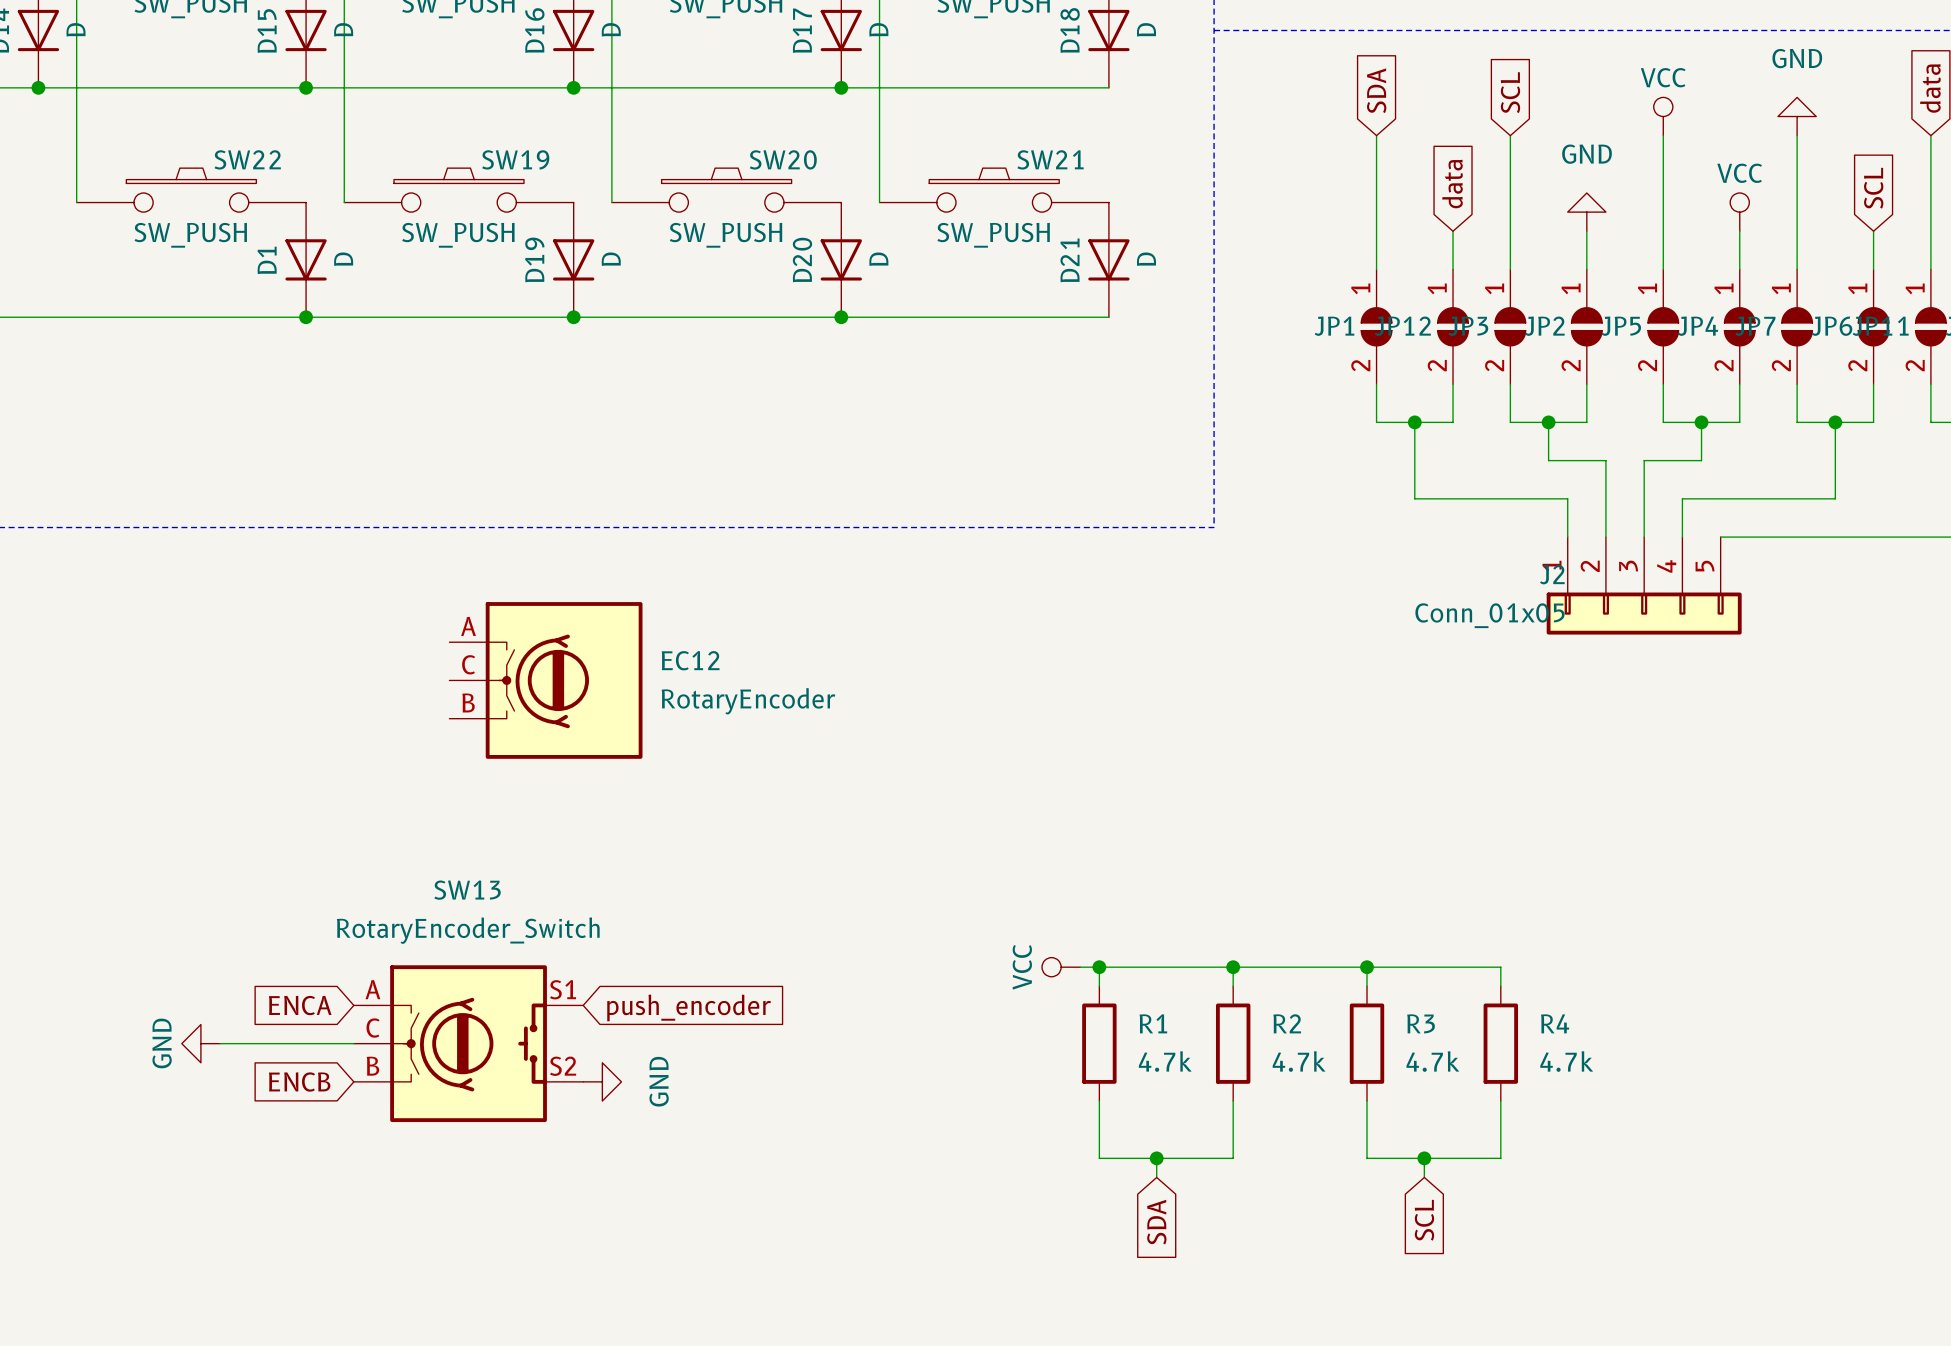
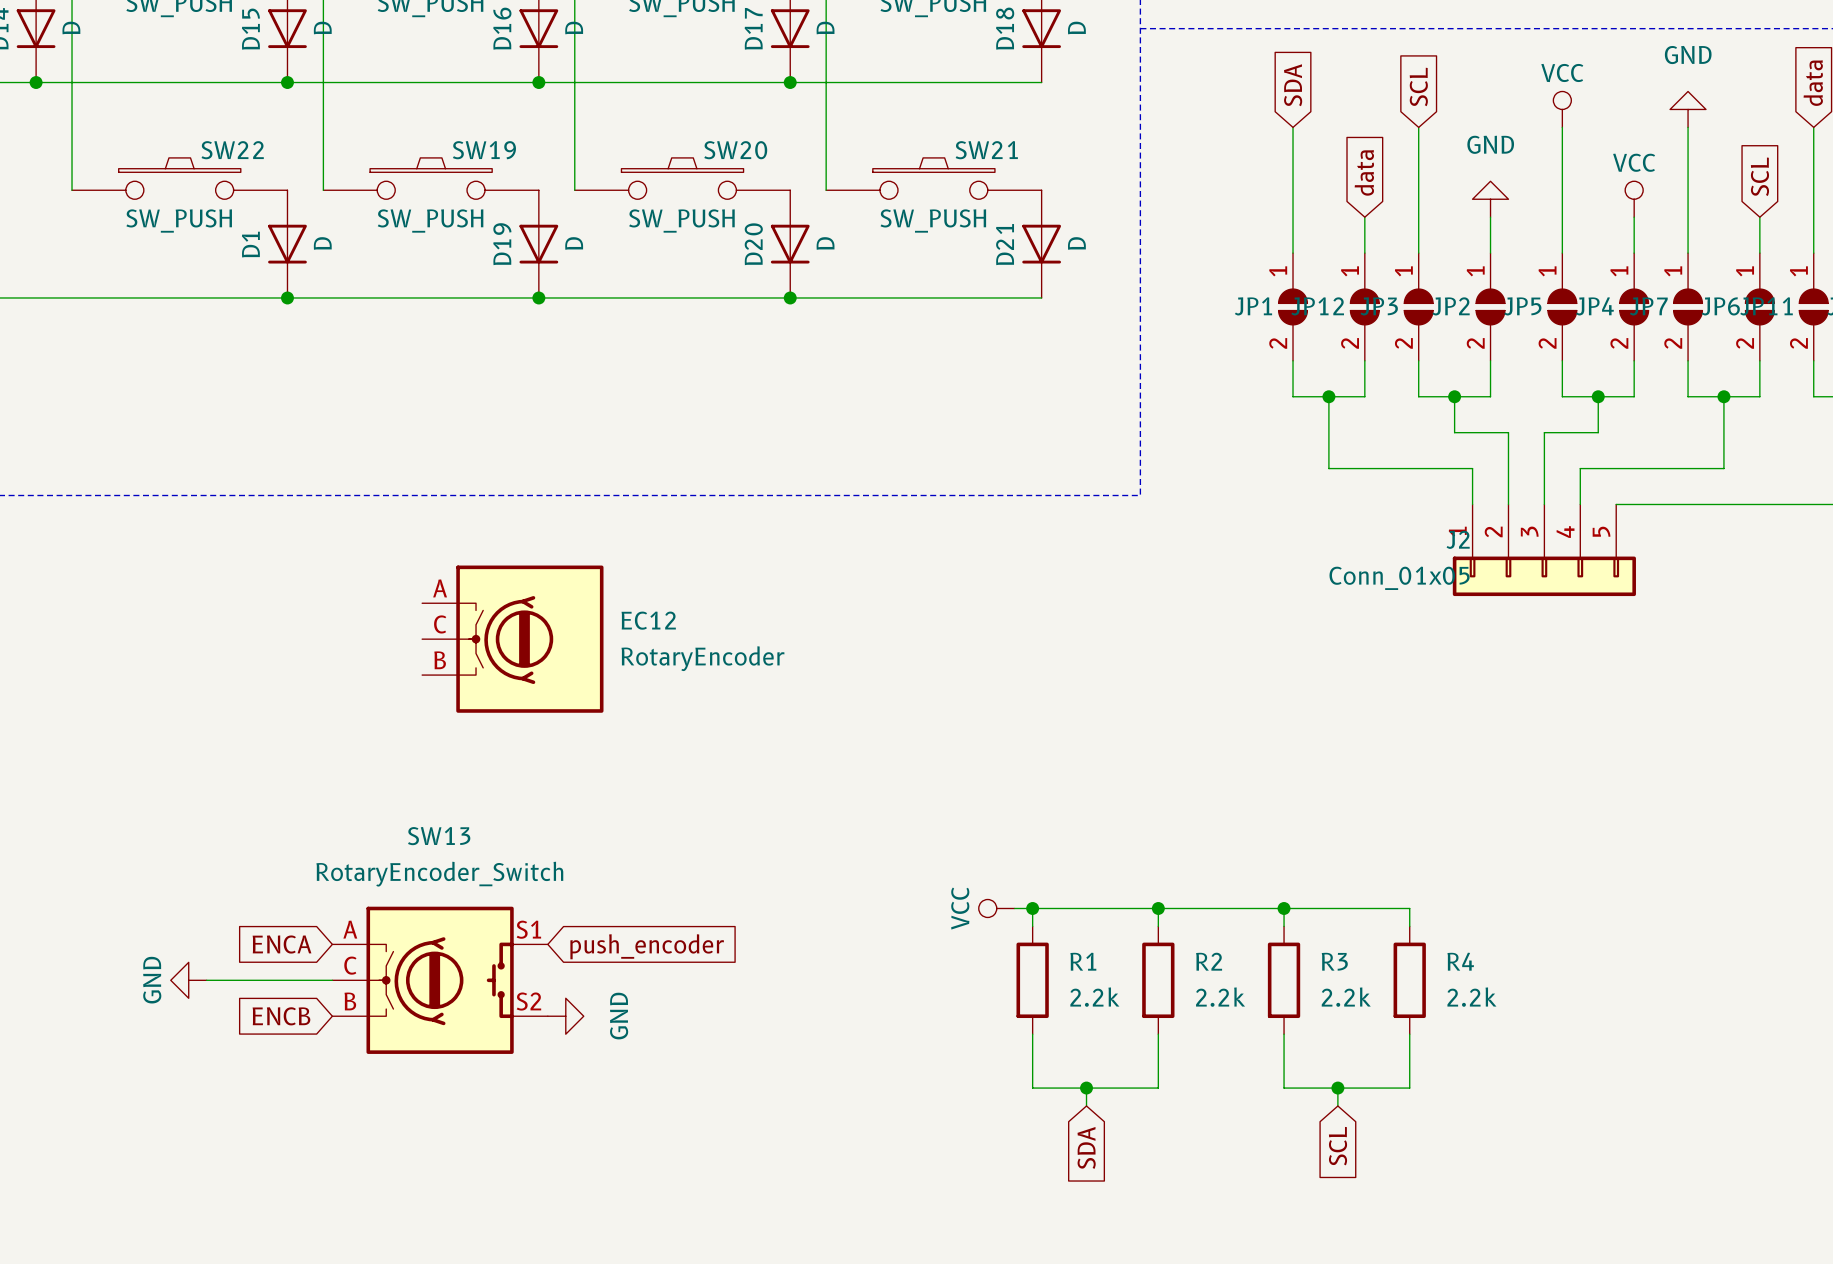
R1 value: 4.7k (1165, 1061) -> 2.2k (1094, 997)
R2 value: 4.7k (1299, 1061) -> 2.2k (1220, 997)
R3 value: 4.7k (1432, 1061) -> 2.2k (1346, 997)
R4 value: 4.7k (1566, 1061) -> 2.2k (1471, 997)

